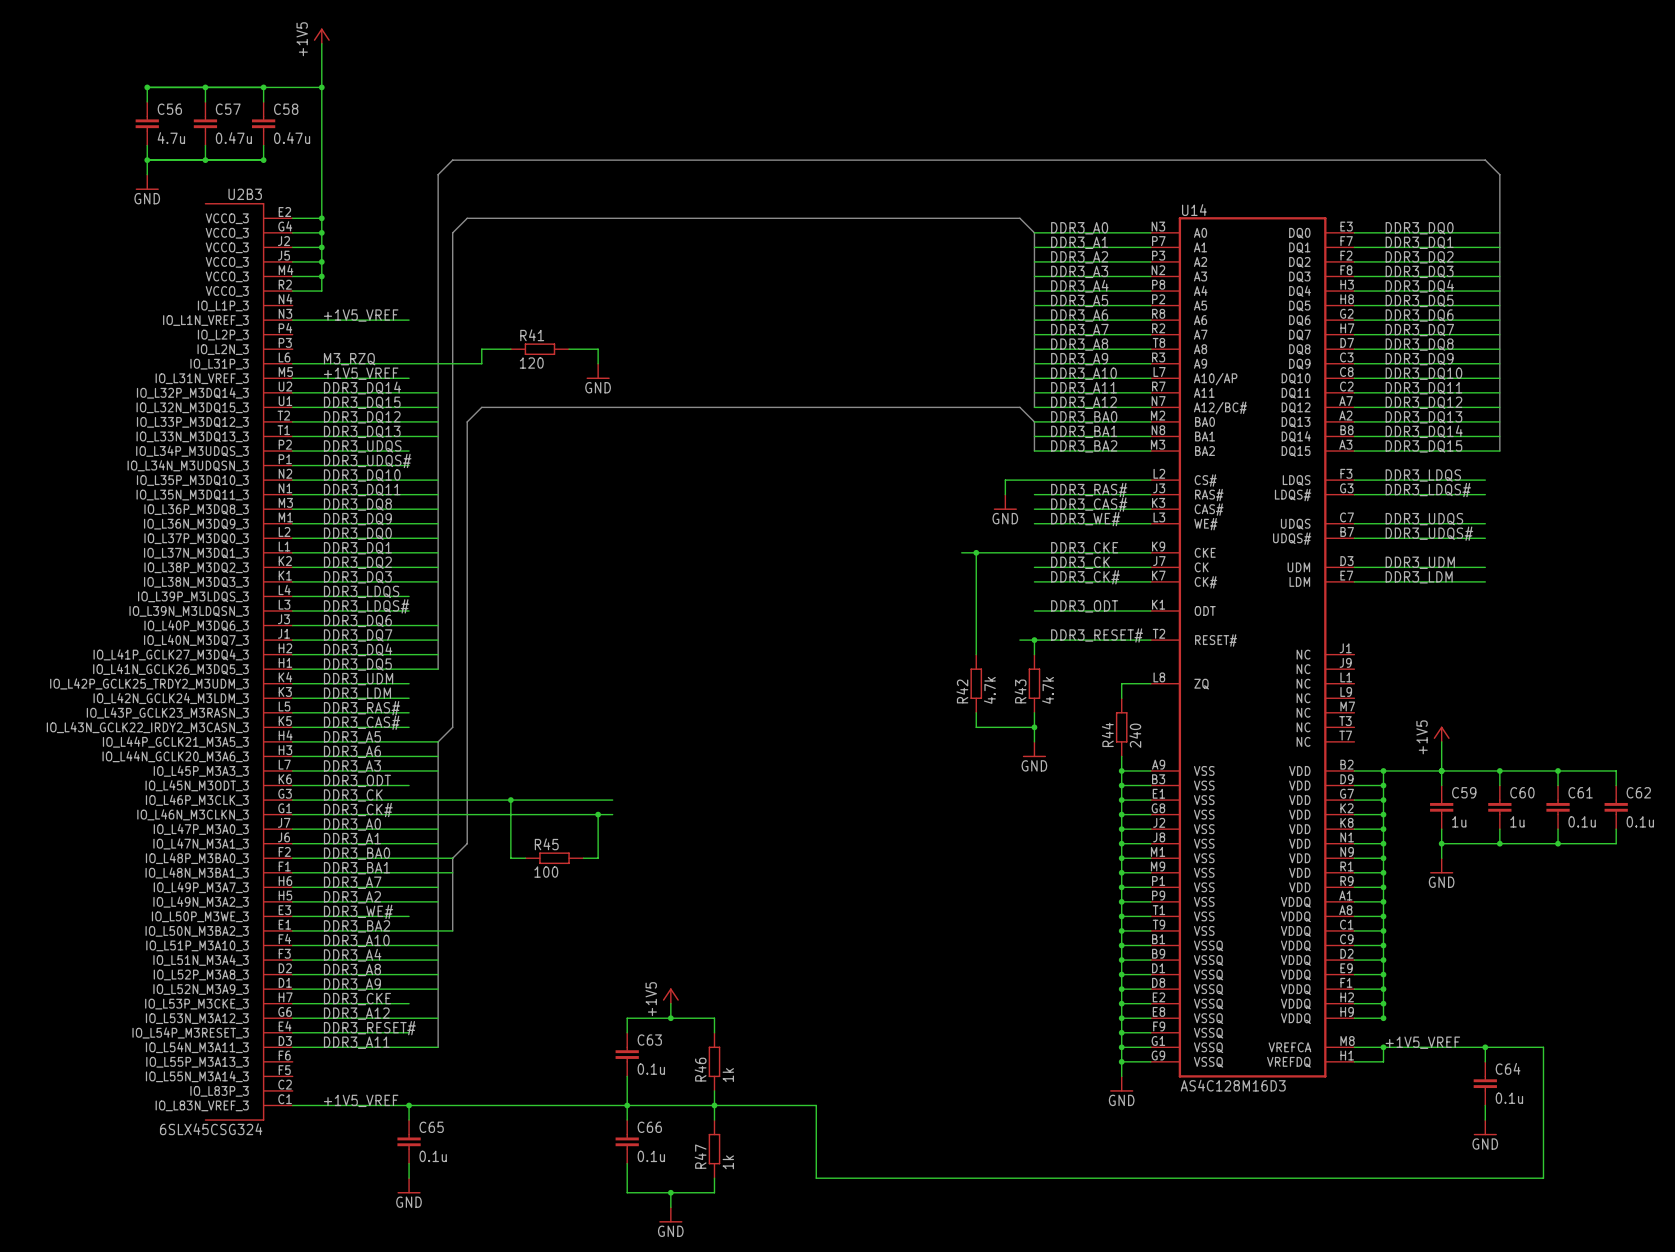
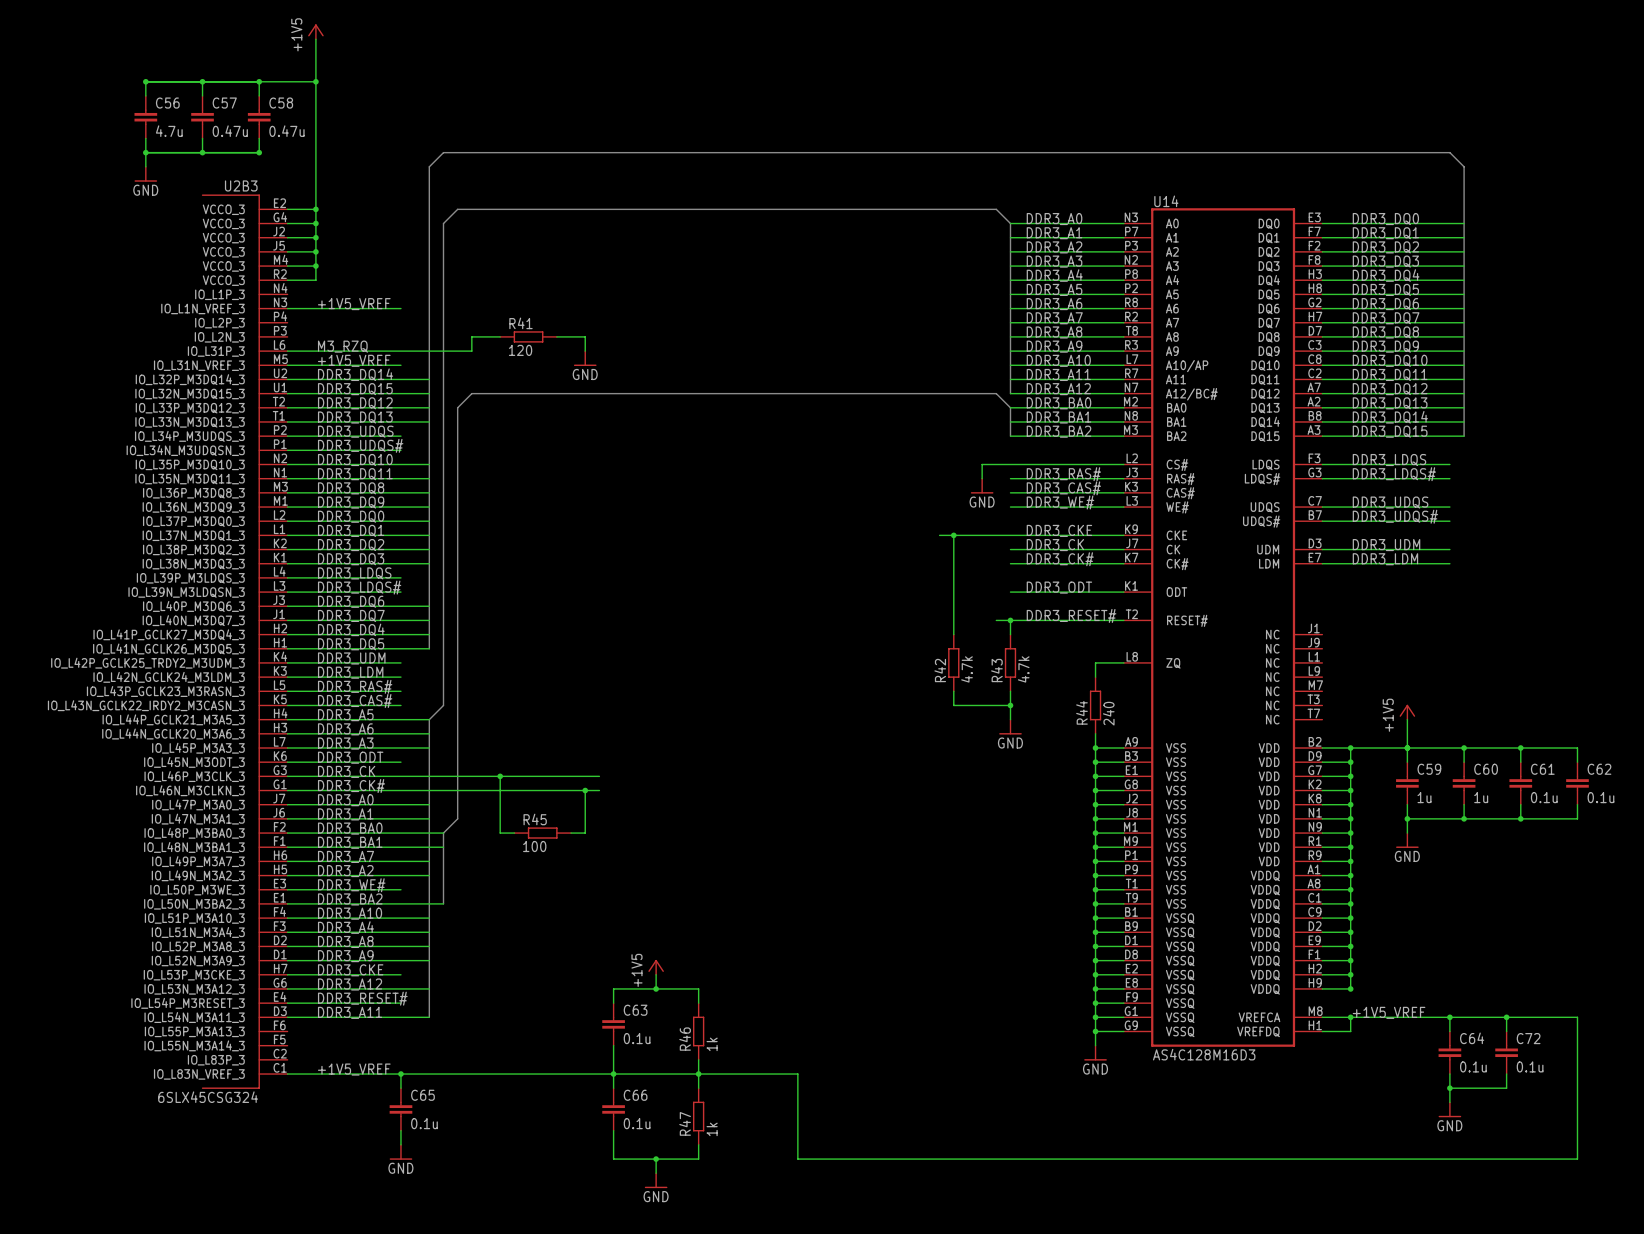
junction: none -> (1506, 1017)
C72: none -> 0.1u (1506, 1052)
junction: none -> (1449, 1088)
wire: (1543, 1120) (1543, 1178) (816, 1178) -> (1506, 1017) (1577, 1017) (1577, 1159) (797, 1159) (797, 1144)
wire: none -> (1506, 1088) (1449, 1088) (1449, 1102)
power symbol position: GND (1485, 1127) -> GND (1449, 1109)

